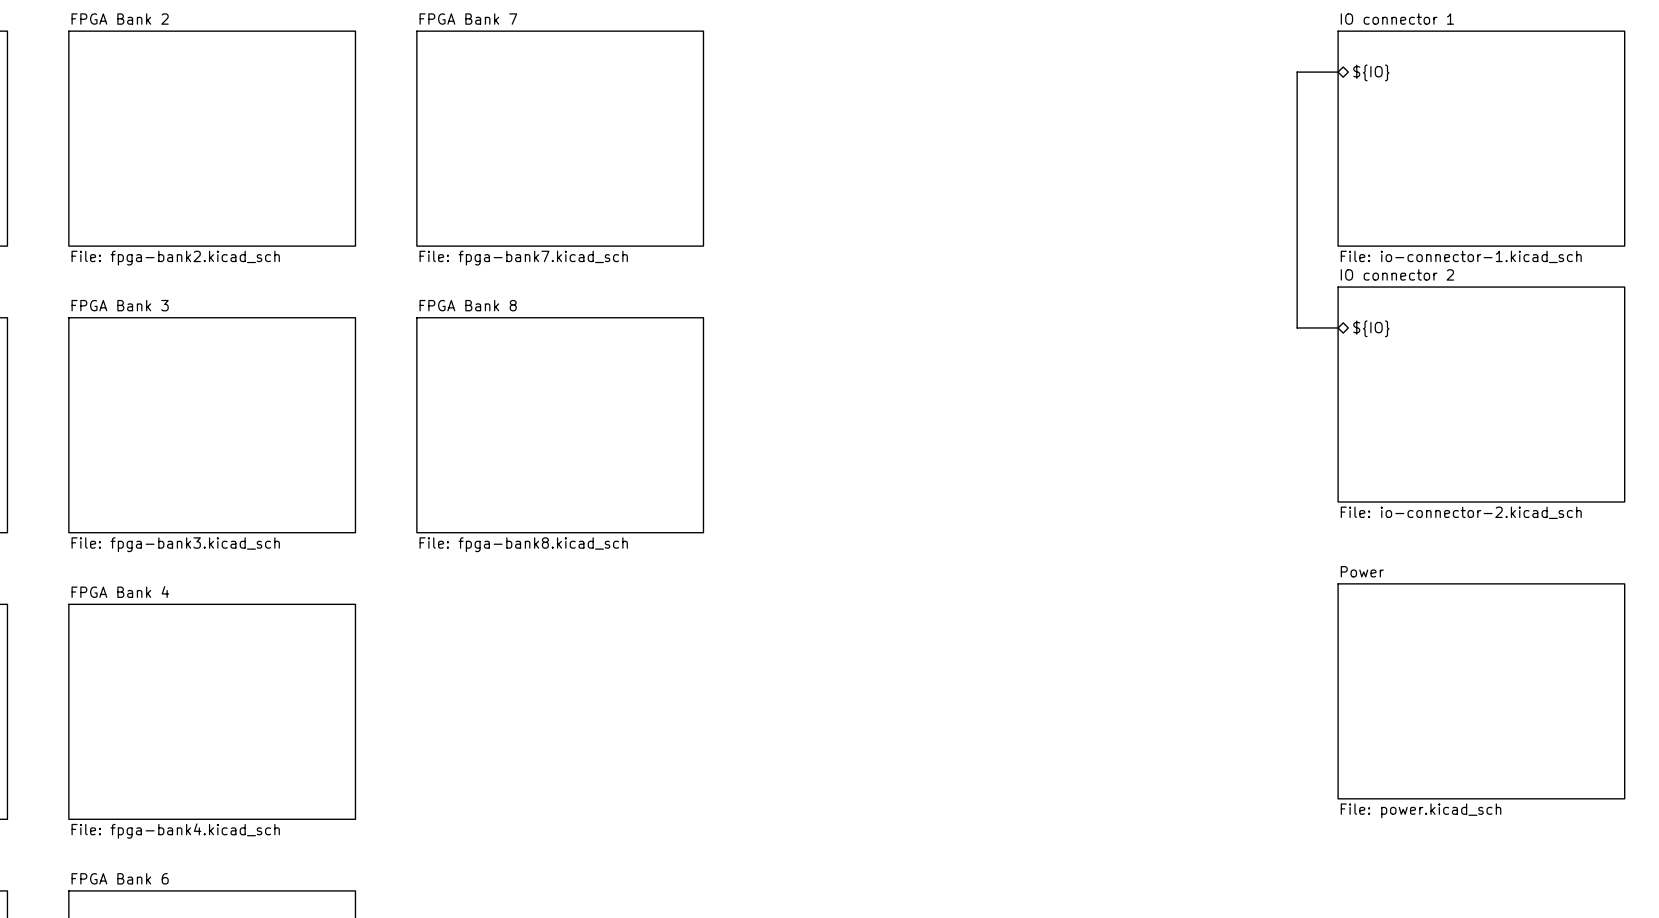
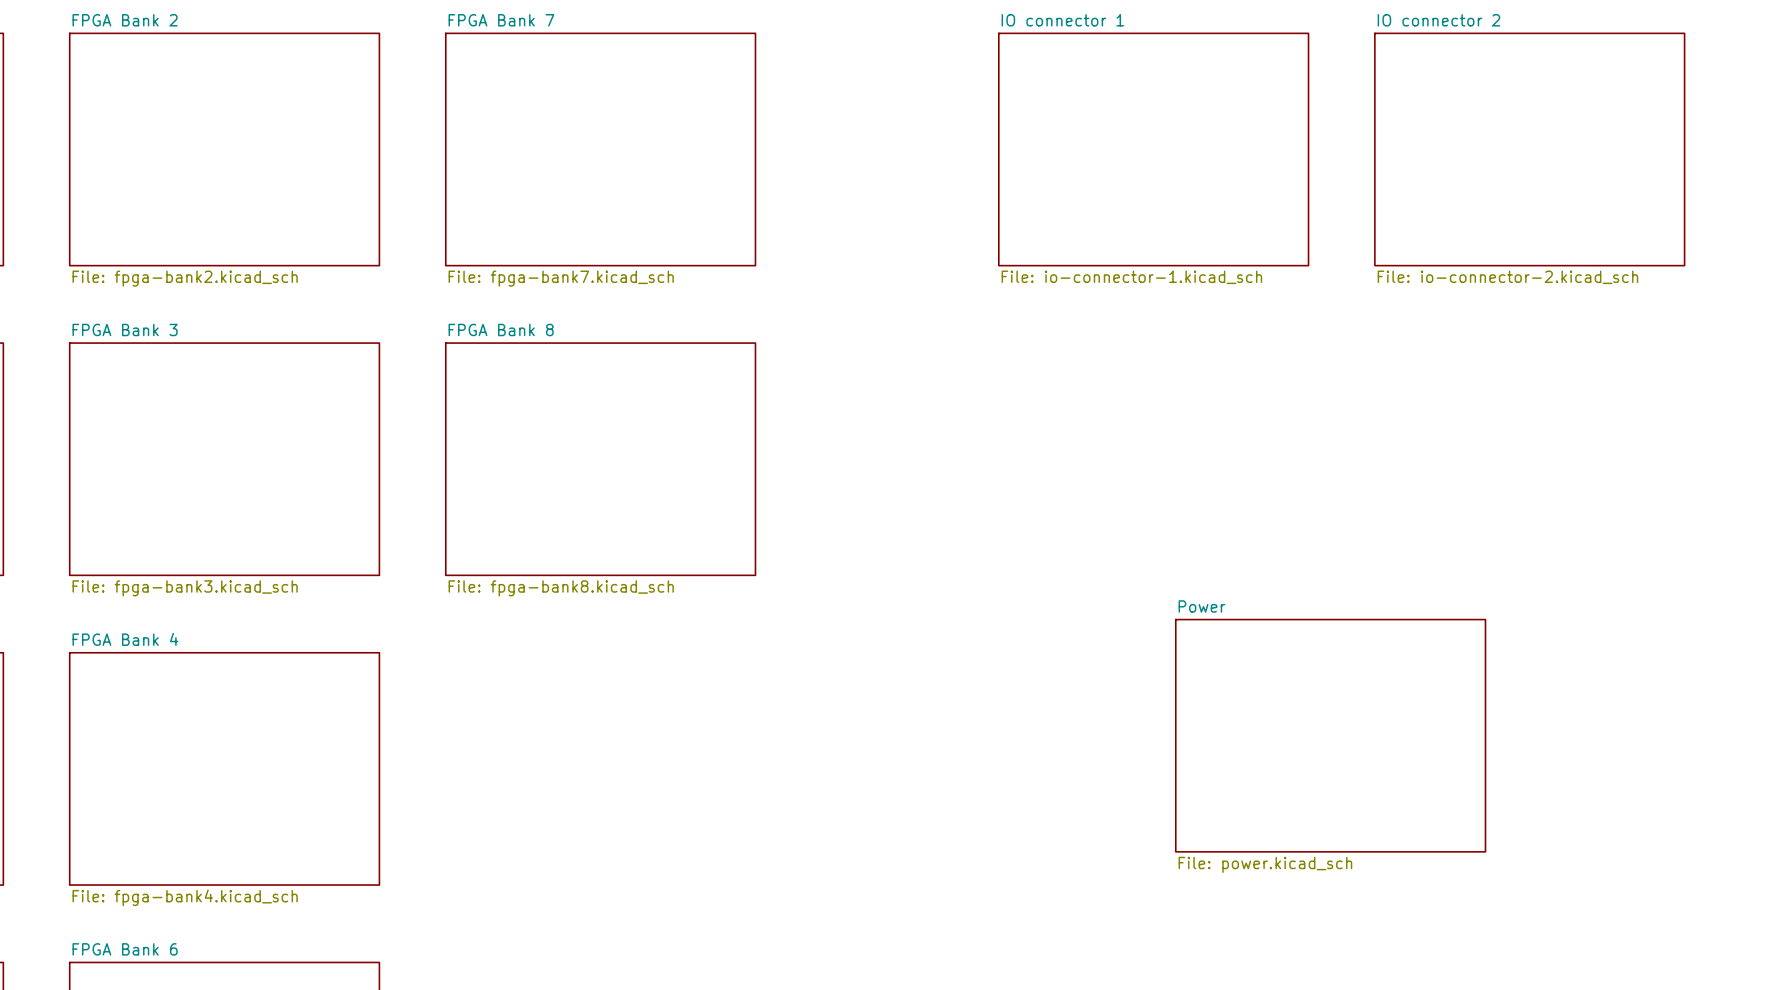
bus: (1338, 72) (1297, 72) (1297, 327) (1338, 327) -> none
sheet pin: ${IO} (1371, 72) -> none
sheet IO connector 1 position: (1481, 138) -> (1153, 149)
sheet pin: ${IO} (1371, 328) -> none
sheet IO connector 2 position: (1481, 394) -> (1529, 149)
sheet Power: none -> File: power.kicad_sch (1330, 735)
sheet Power: File: power.kicad_sch (1481, 691) -> none

